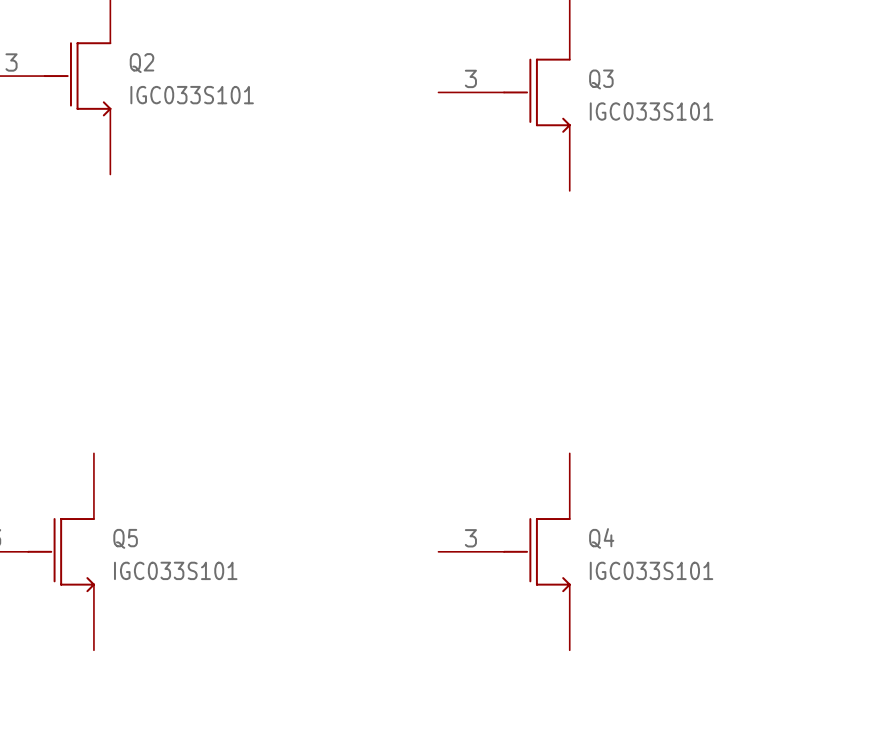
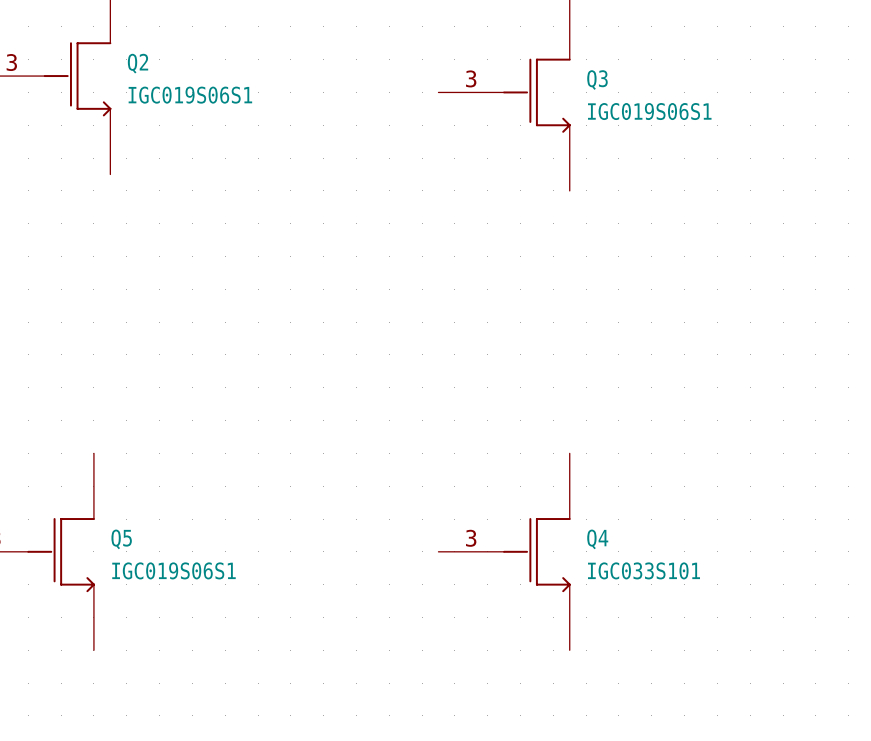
Q2 value: IGC033S101 (192, 95) -> IGC019S06S1 (190, 95)
Q3 value: IGC033S101 (651, 111) -> IGC019S06S1 (649, 111)
Q5 value: IGC033S101 (175, 570) -> IGC019S06S1 (173, 570)

